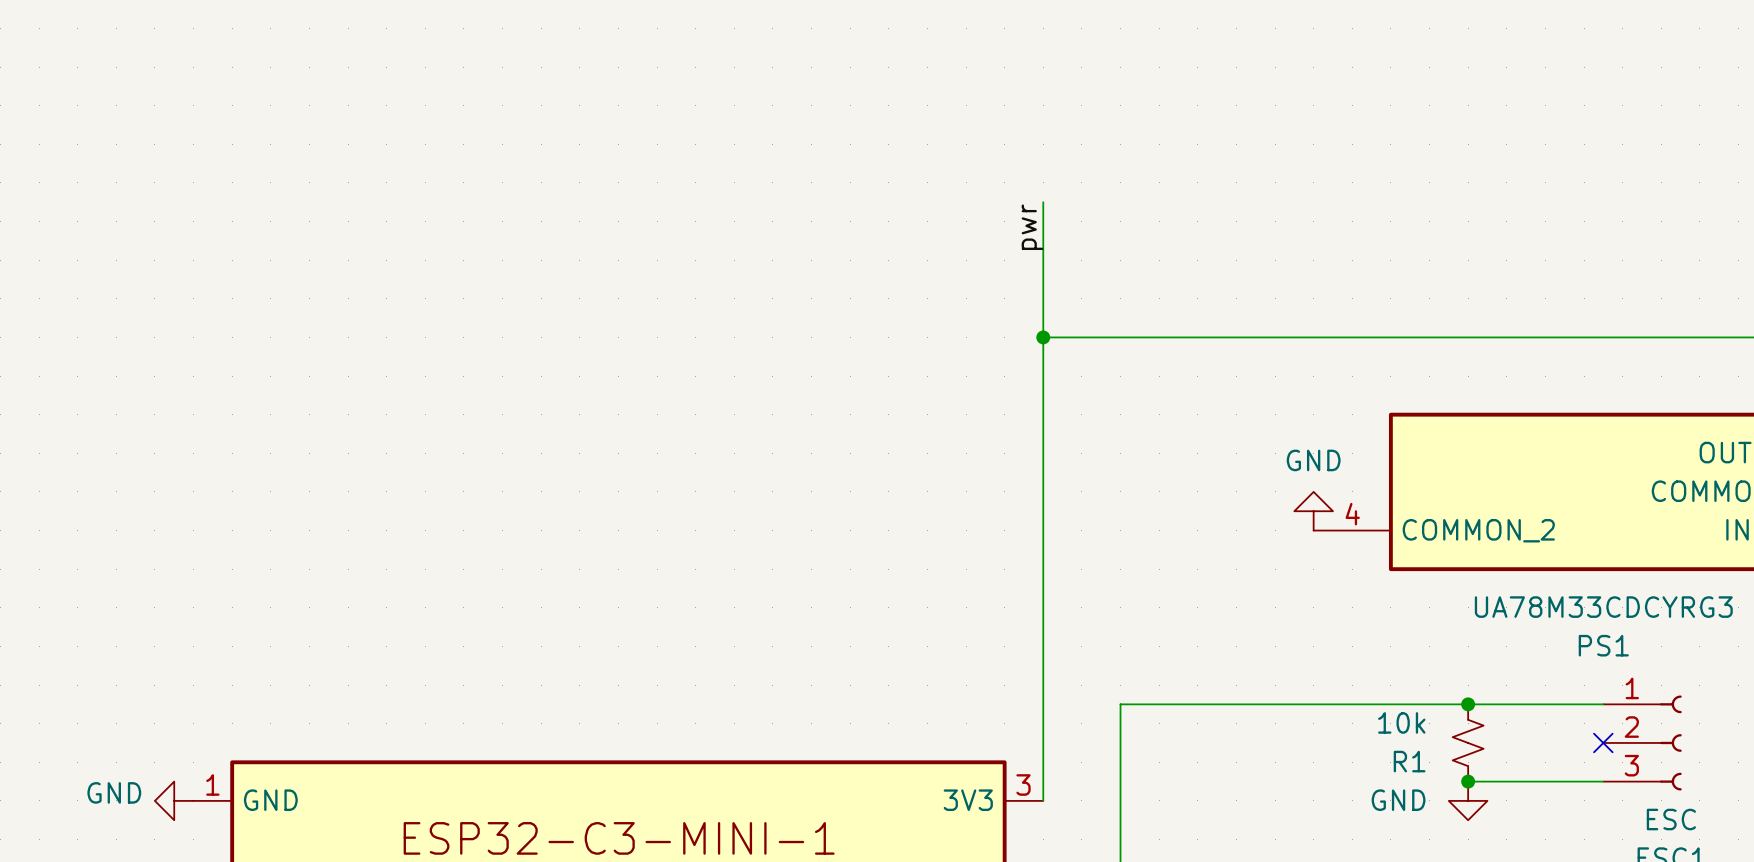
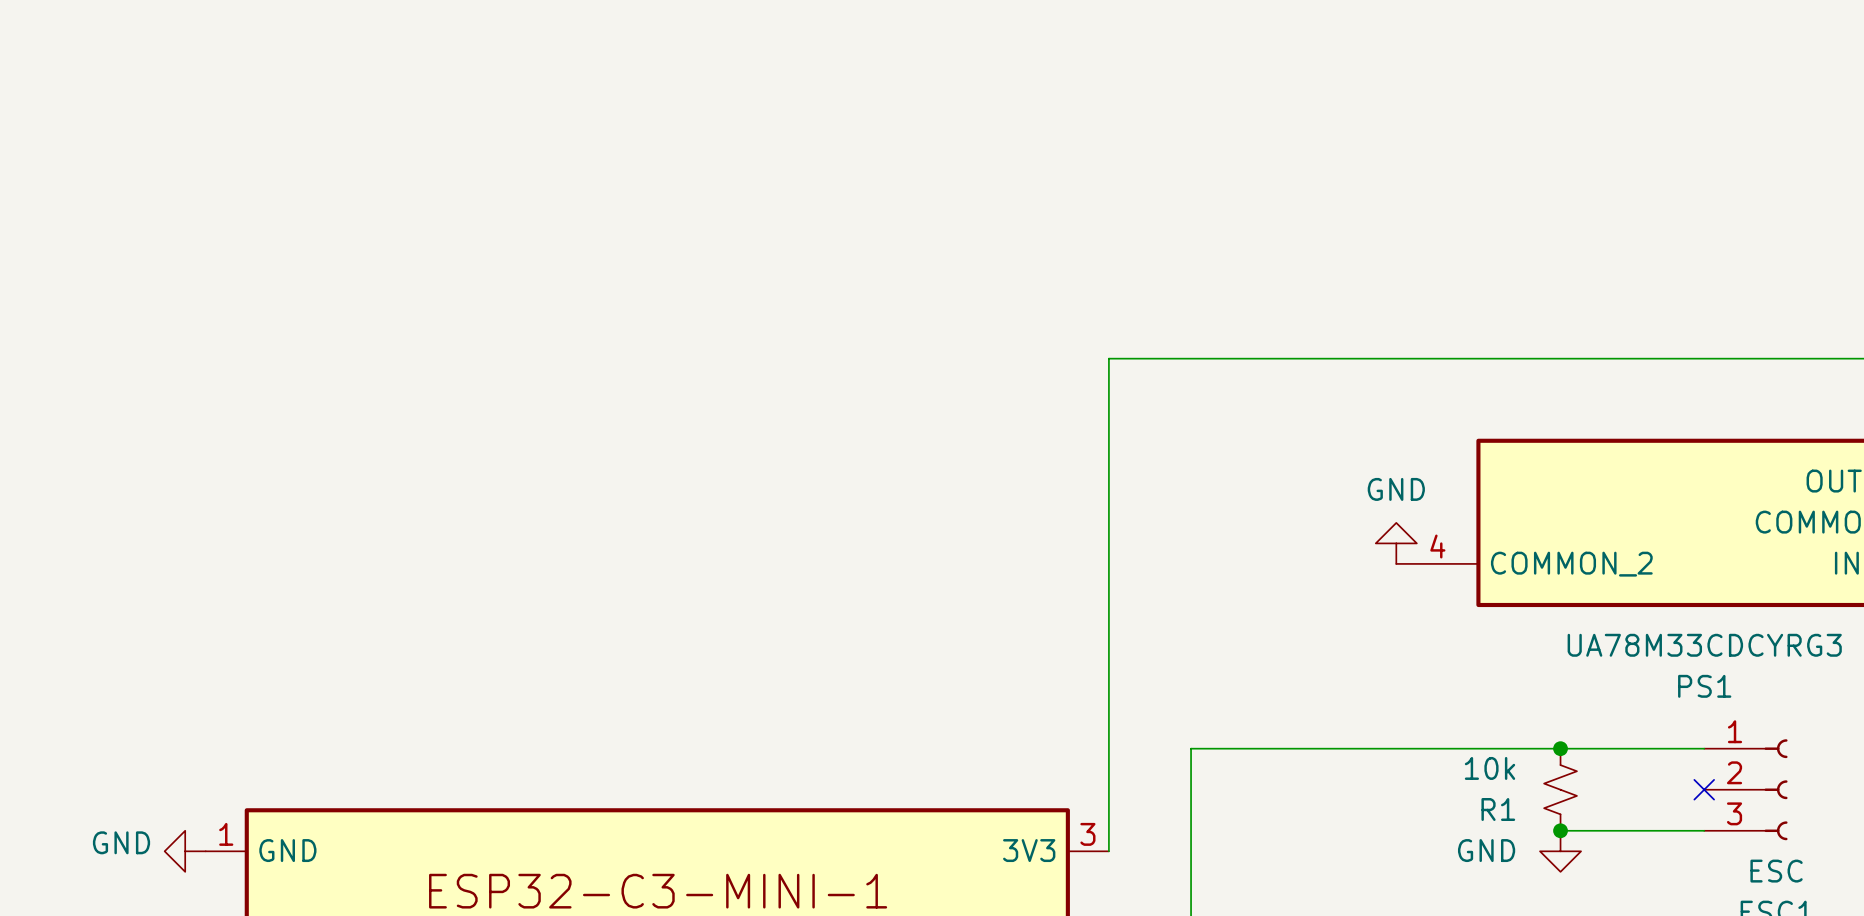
wire: (1043, 202) (1043, 337) -> none
label: pwr (1032, 227) -> none
junction: (1043, 337) -> none

